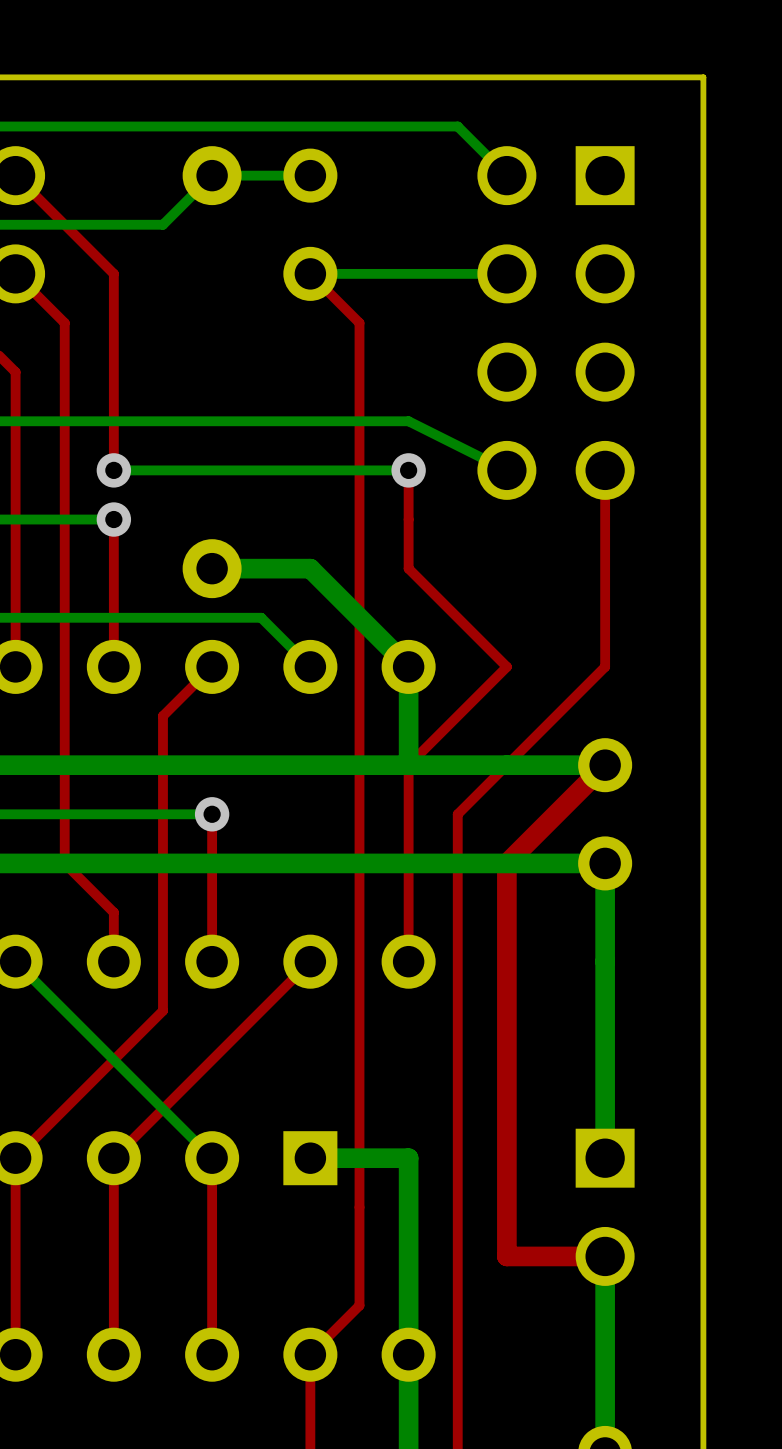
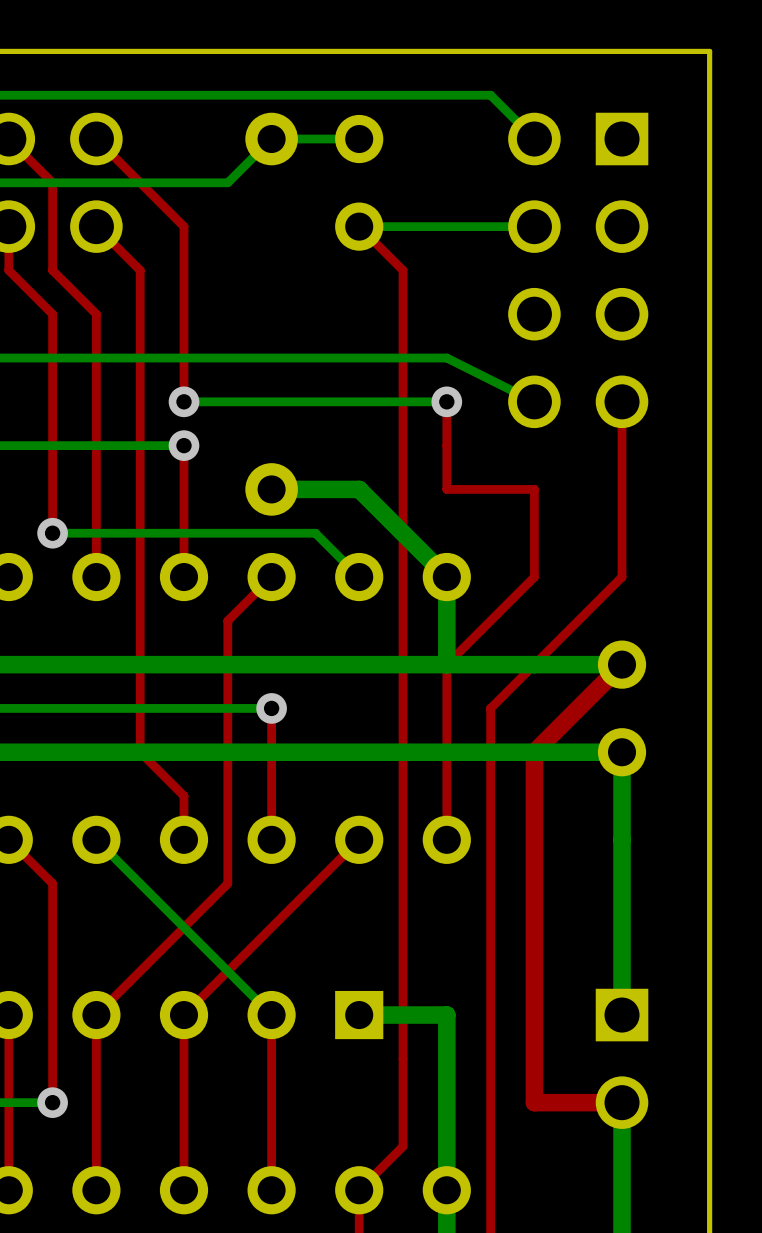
top track: (408, 568) (506, 666) -> (446, 489) (534, 489) (534, 577)

